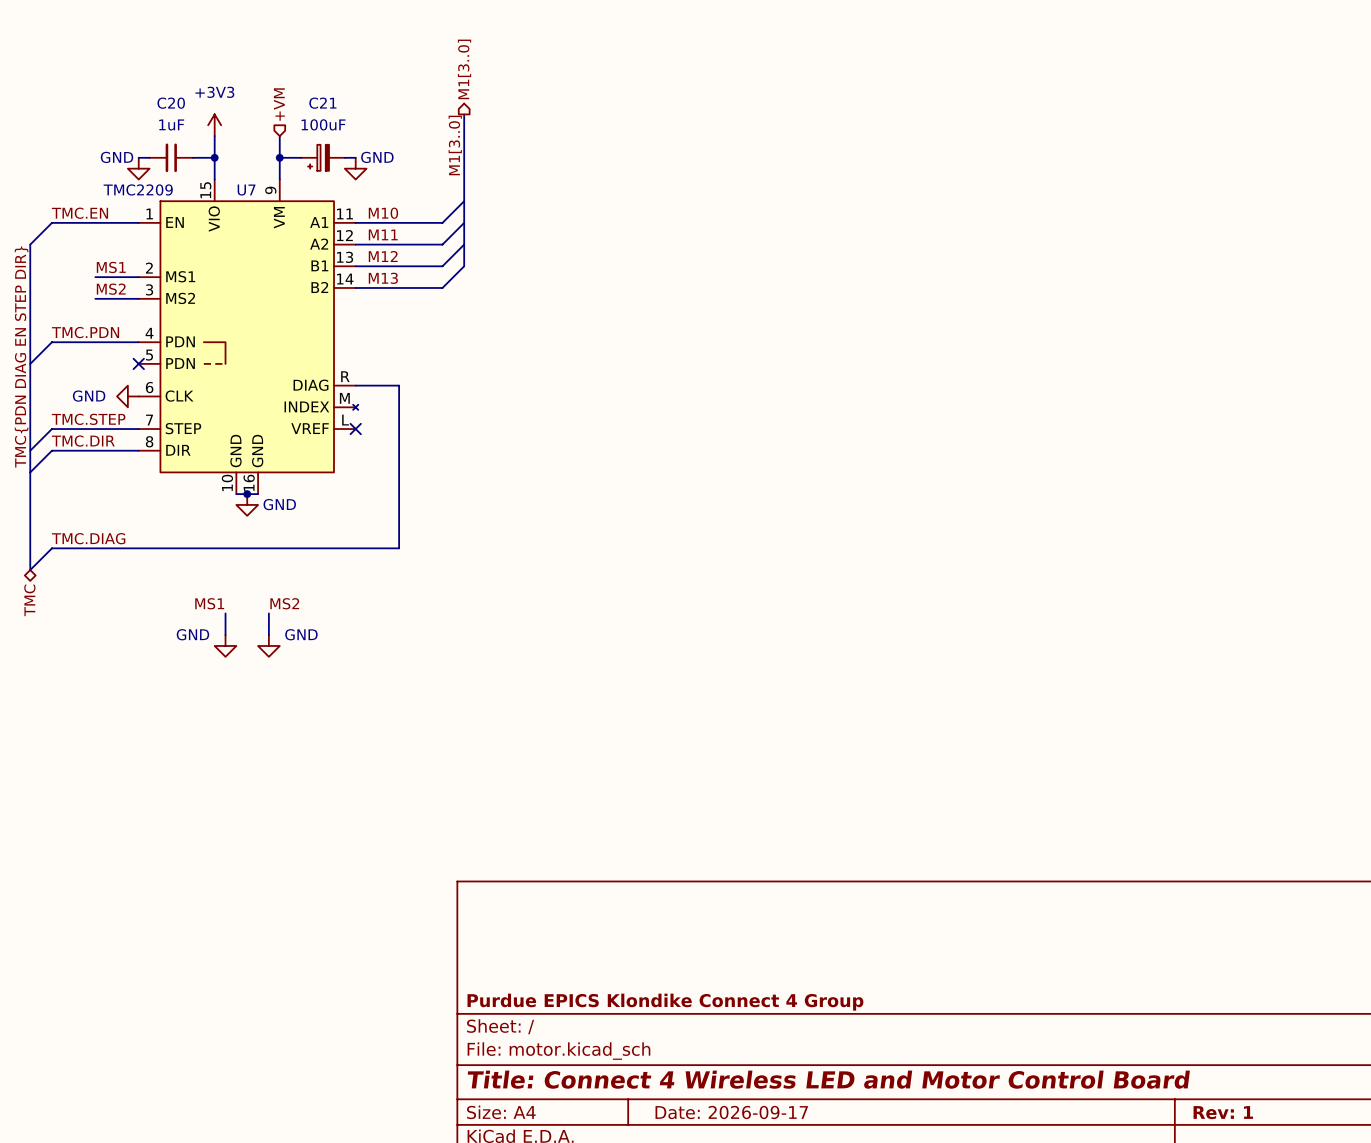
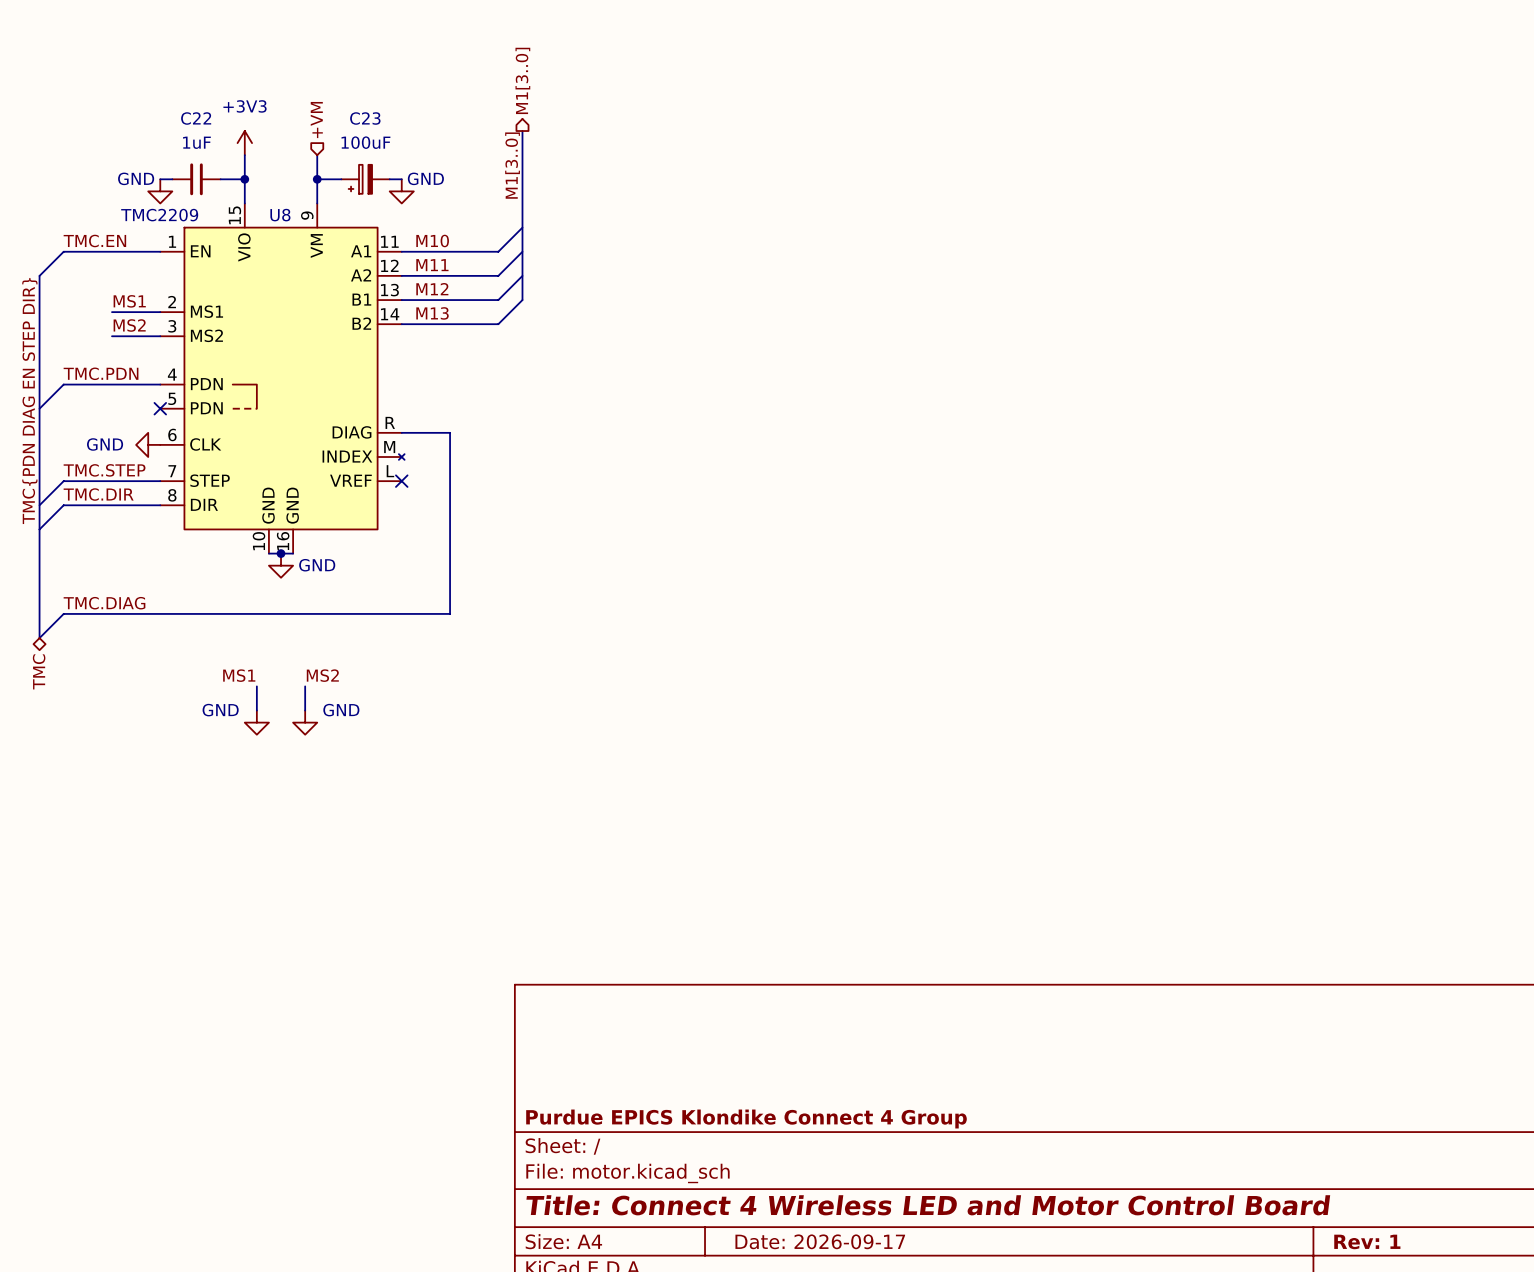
C20 name: C20 (171, 103) -> C22 (196, 118)
C21 name: C21 (322, 103) -> C23 (365, 118)
U7 name: U7 (246, 190) -> U8 (280, 215)

